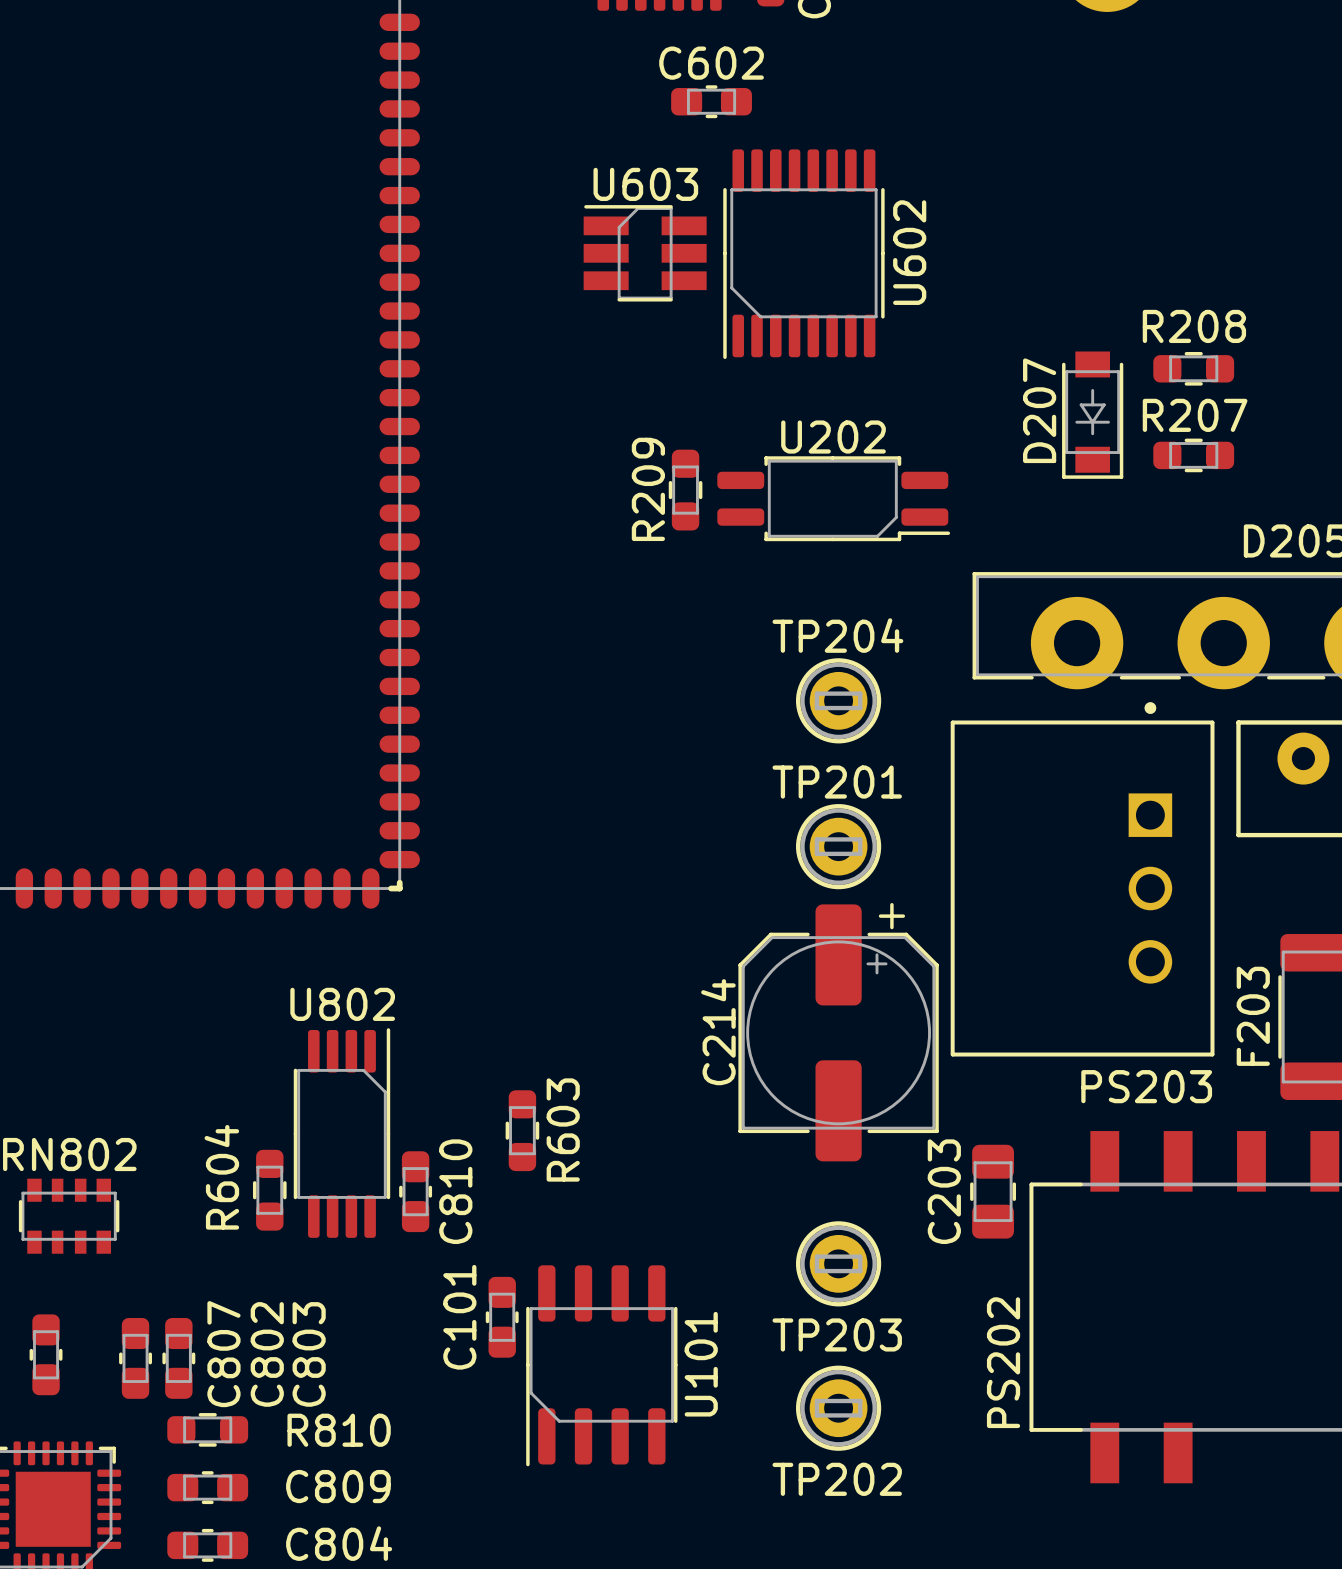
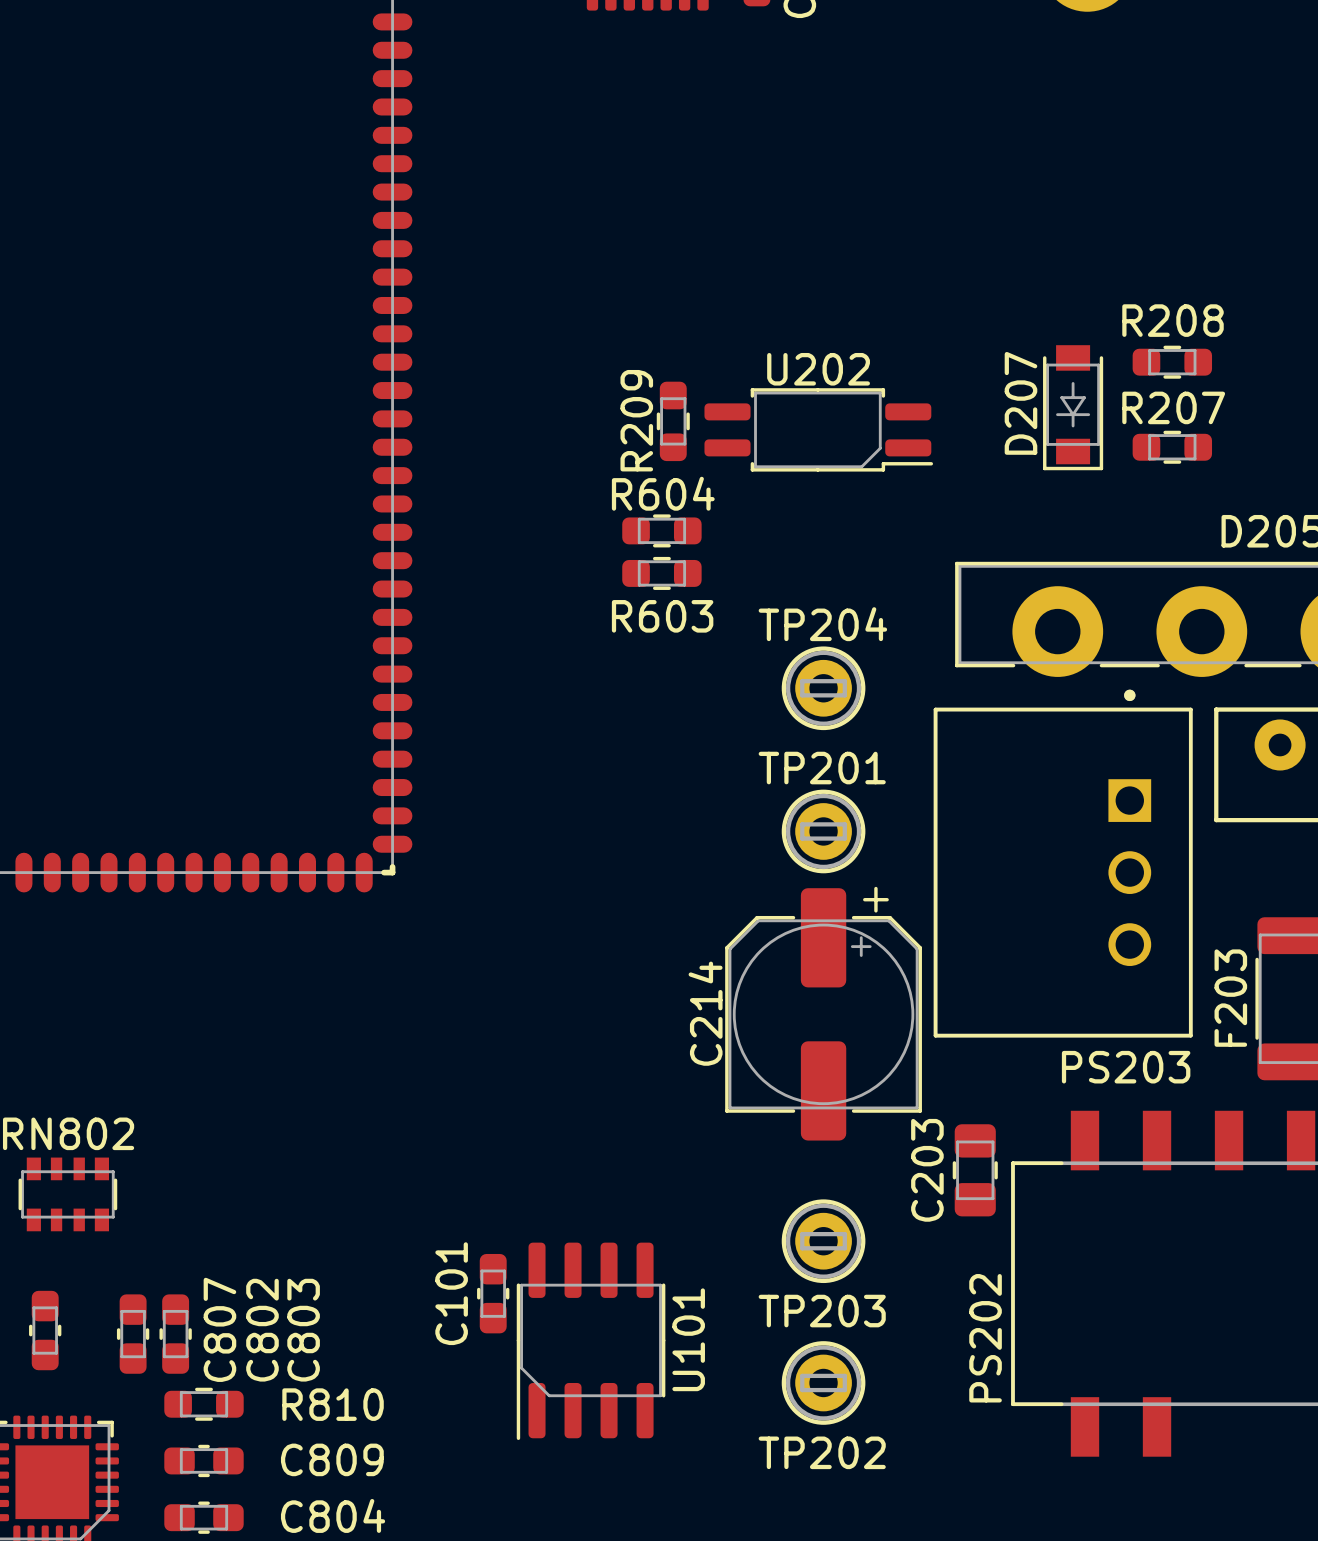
C602: (711, 101) -> none
U603: (645, 253) -> none
U602: (803, 254) -> none
R209 position: (685, 490) -> (673, 421)
U202 position: (833, 498) -> (818, 429)
R603 rotation: 0° (522, 1130) -> 90° clockwise (661, 573)
R603 position: (522, 1130) -> (661, 573)
U802: (341, 1133) -> none
R604 rotation: 0° (269, 1190) -> 90° clockwise (661, 530)
R604 position: (269, 1190) -> (661, 530)
C810: (415, 1191) -> none

